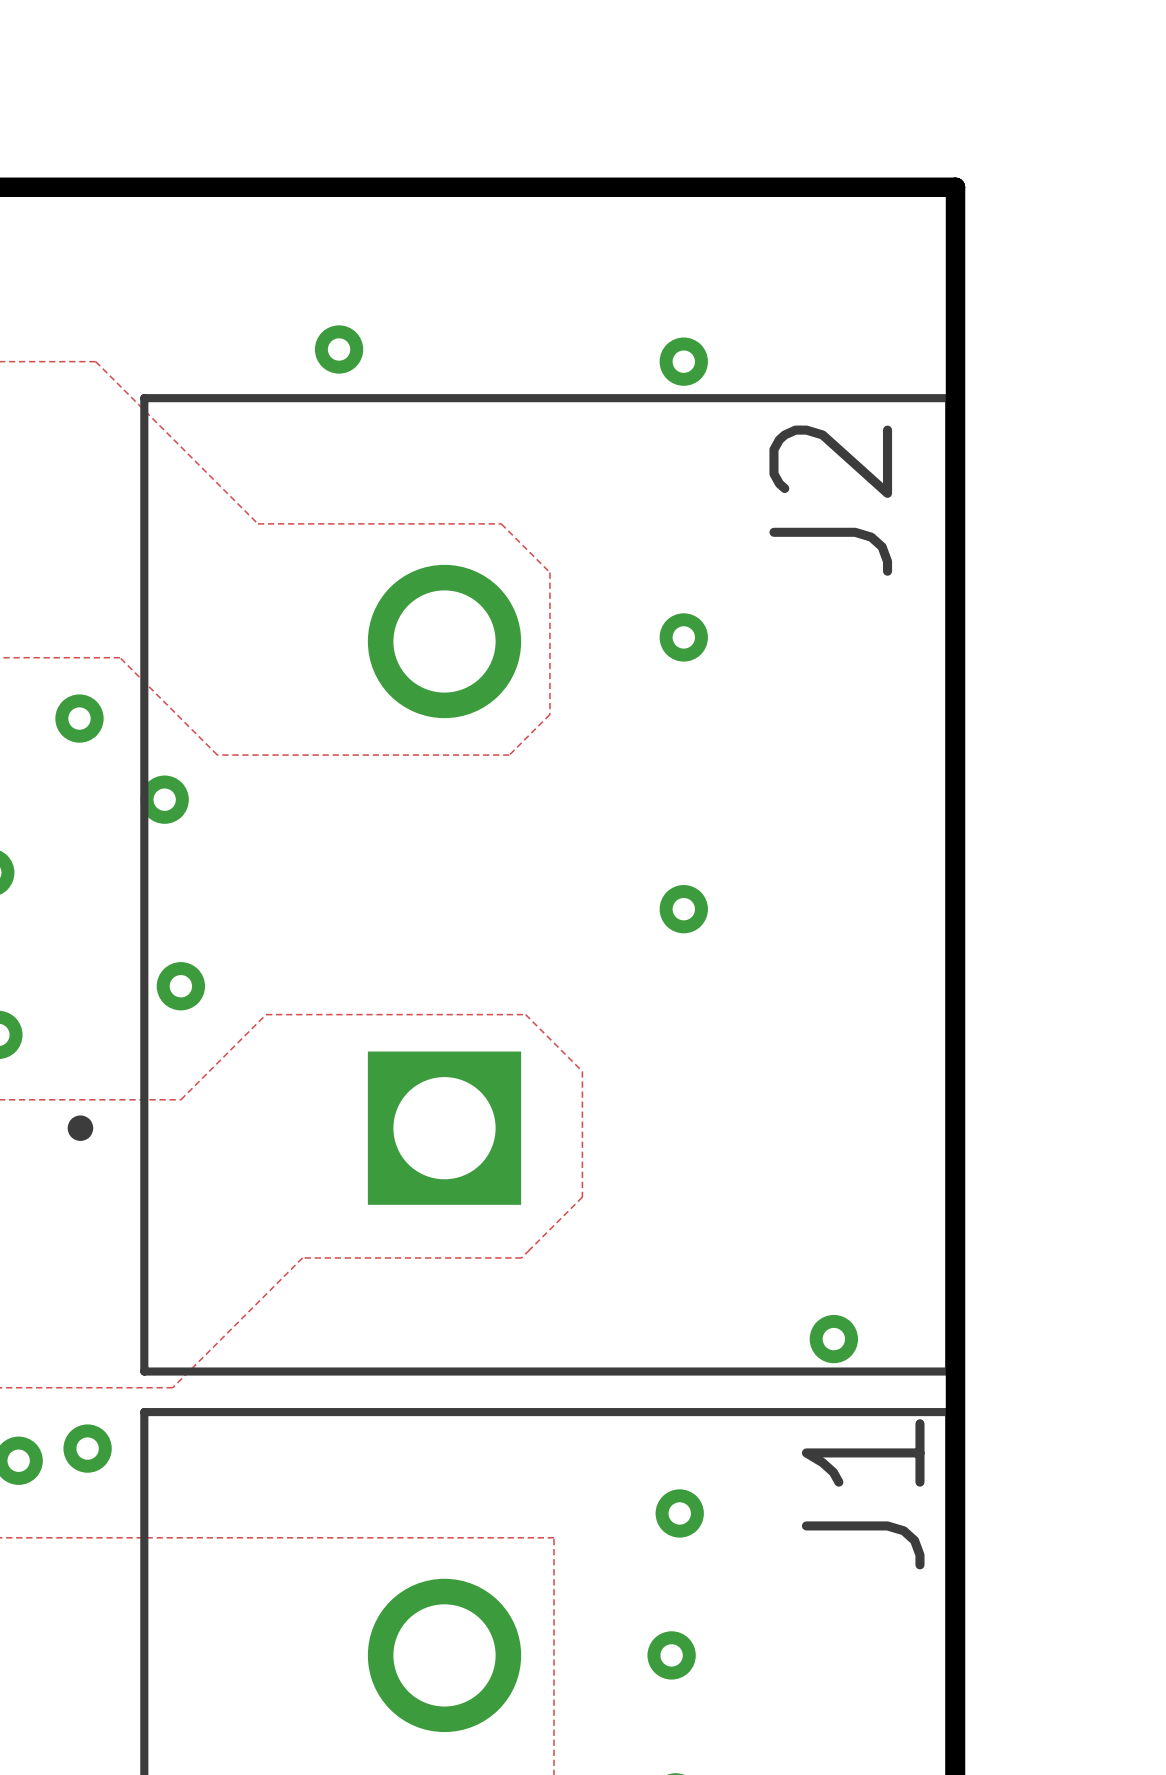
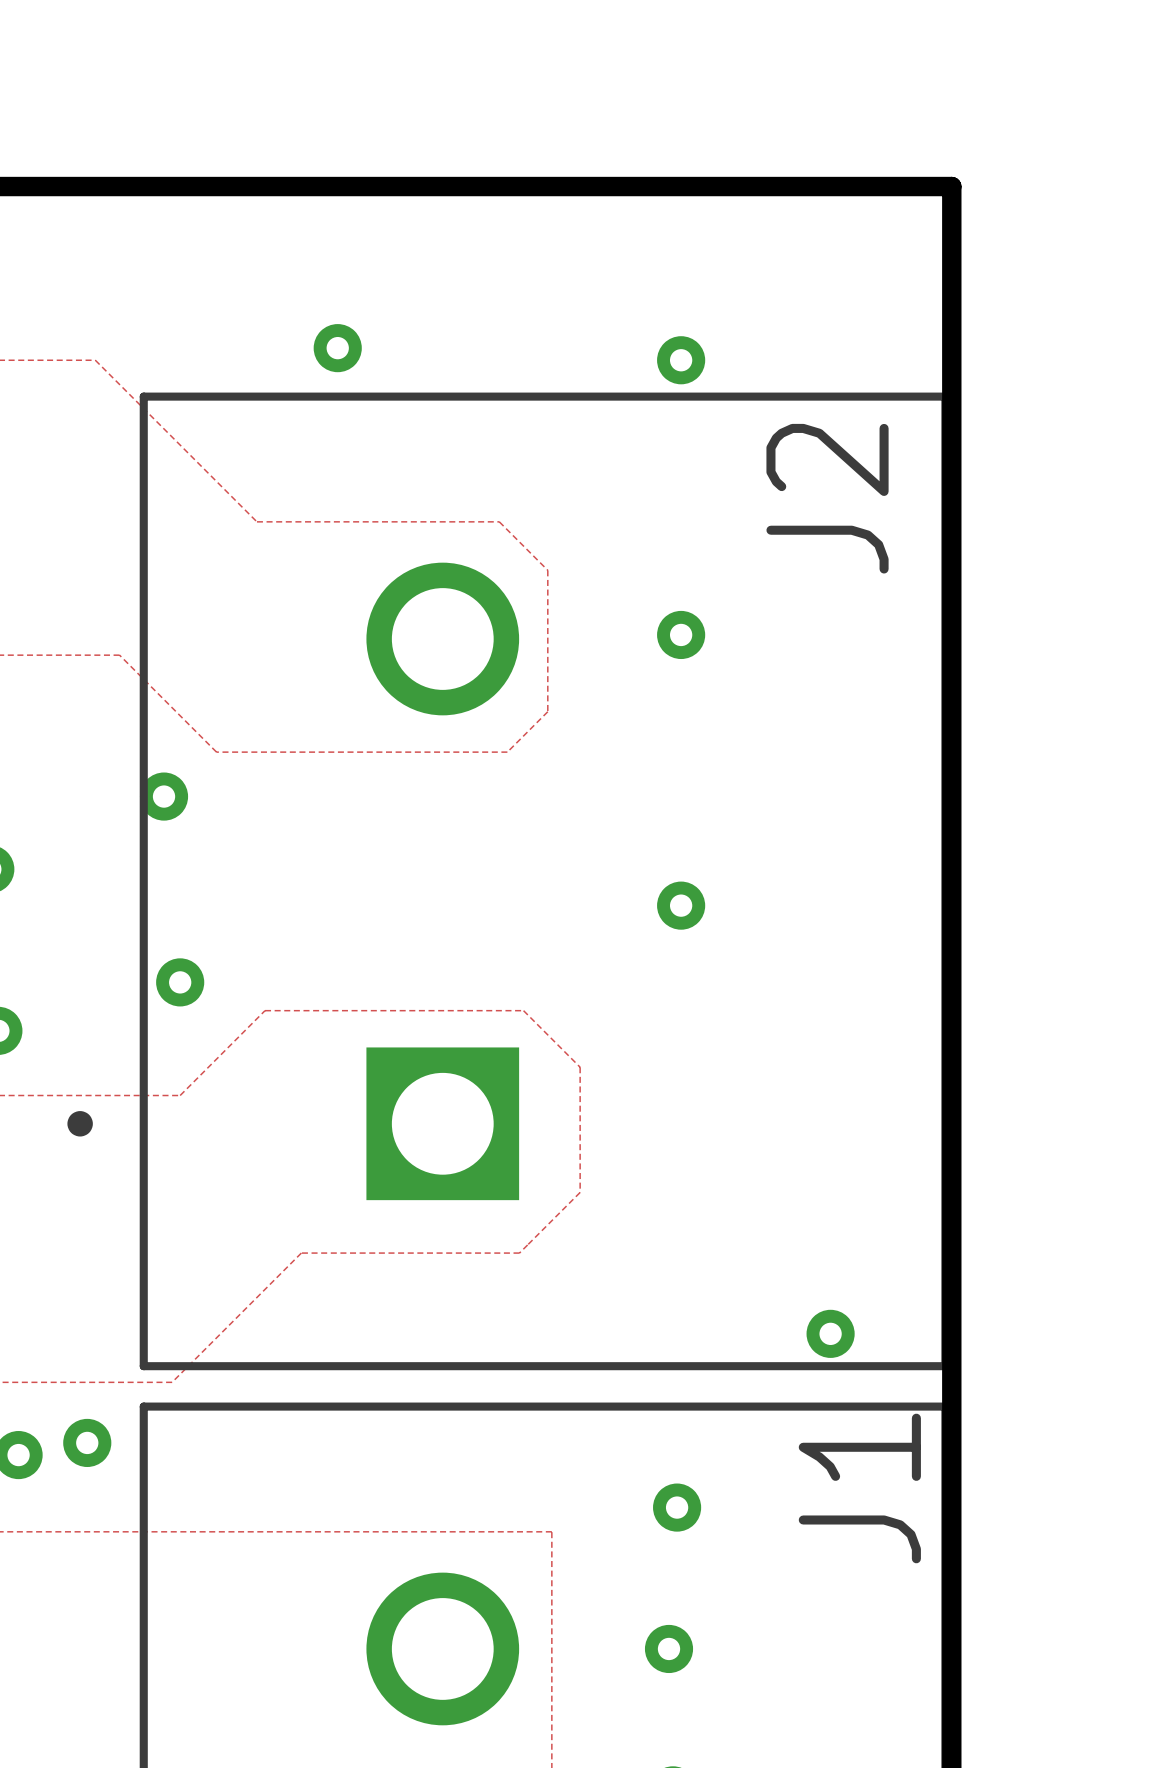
via: (79, 718) -> none

